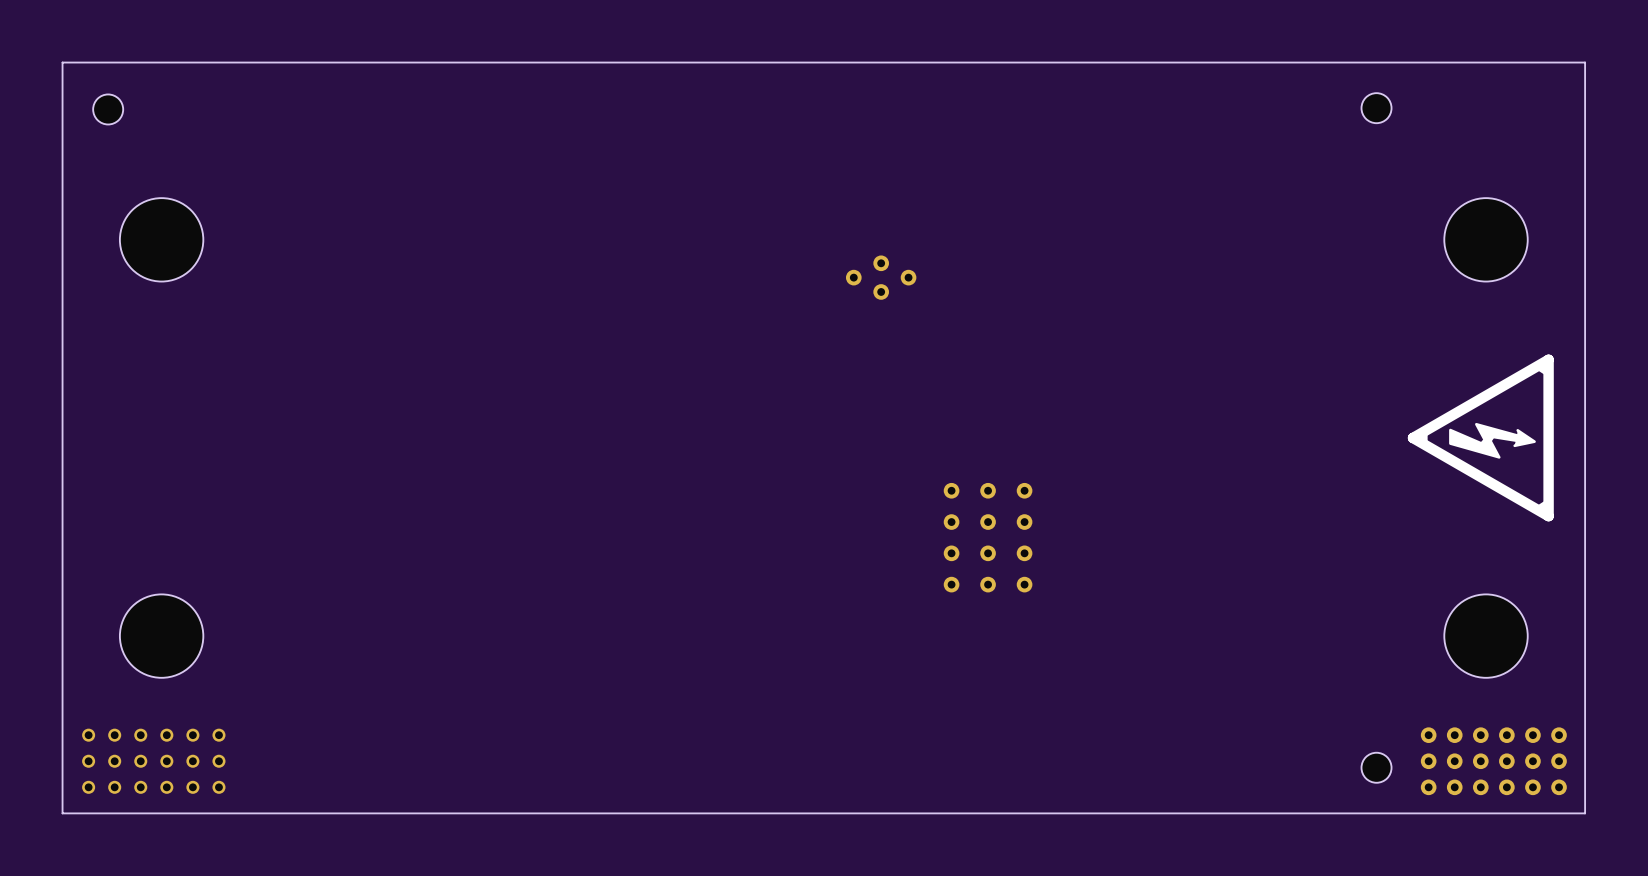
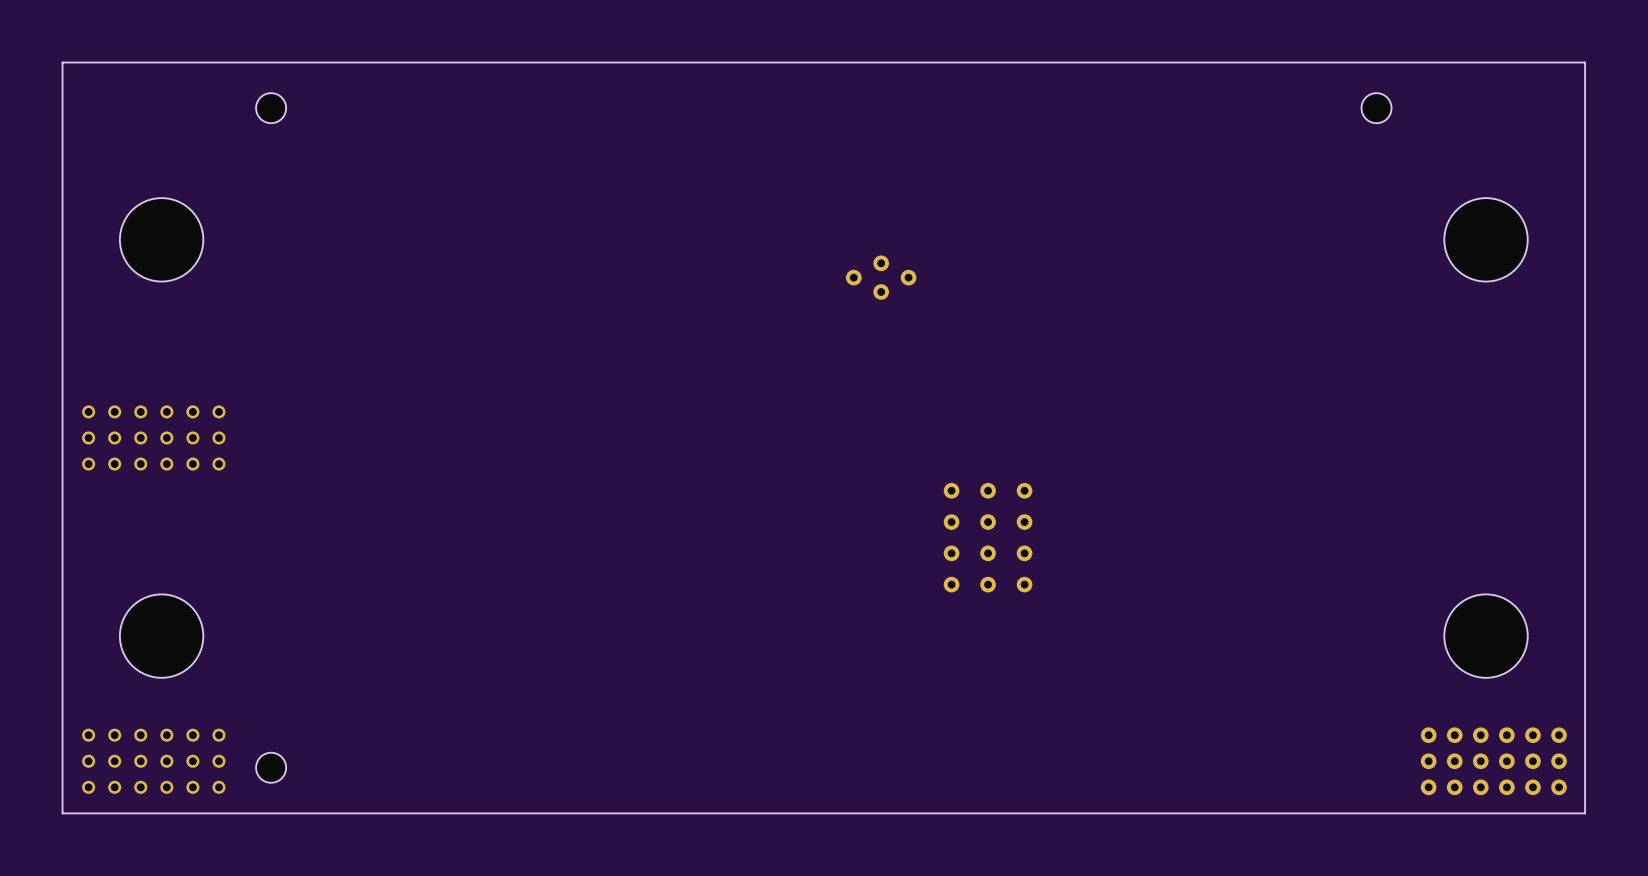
part position: (108, 109) -> (271, 108)
drawing: [1407, 354, 1554, 522] -> none
part: none -> (153, 437)
part: none -> (271, 767)
part: (1376, 767) -> none

